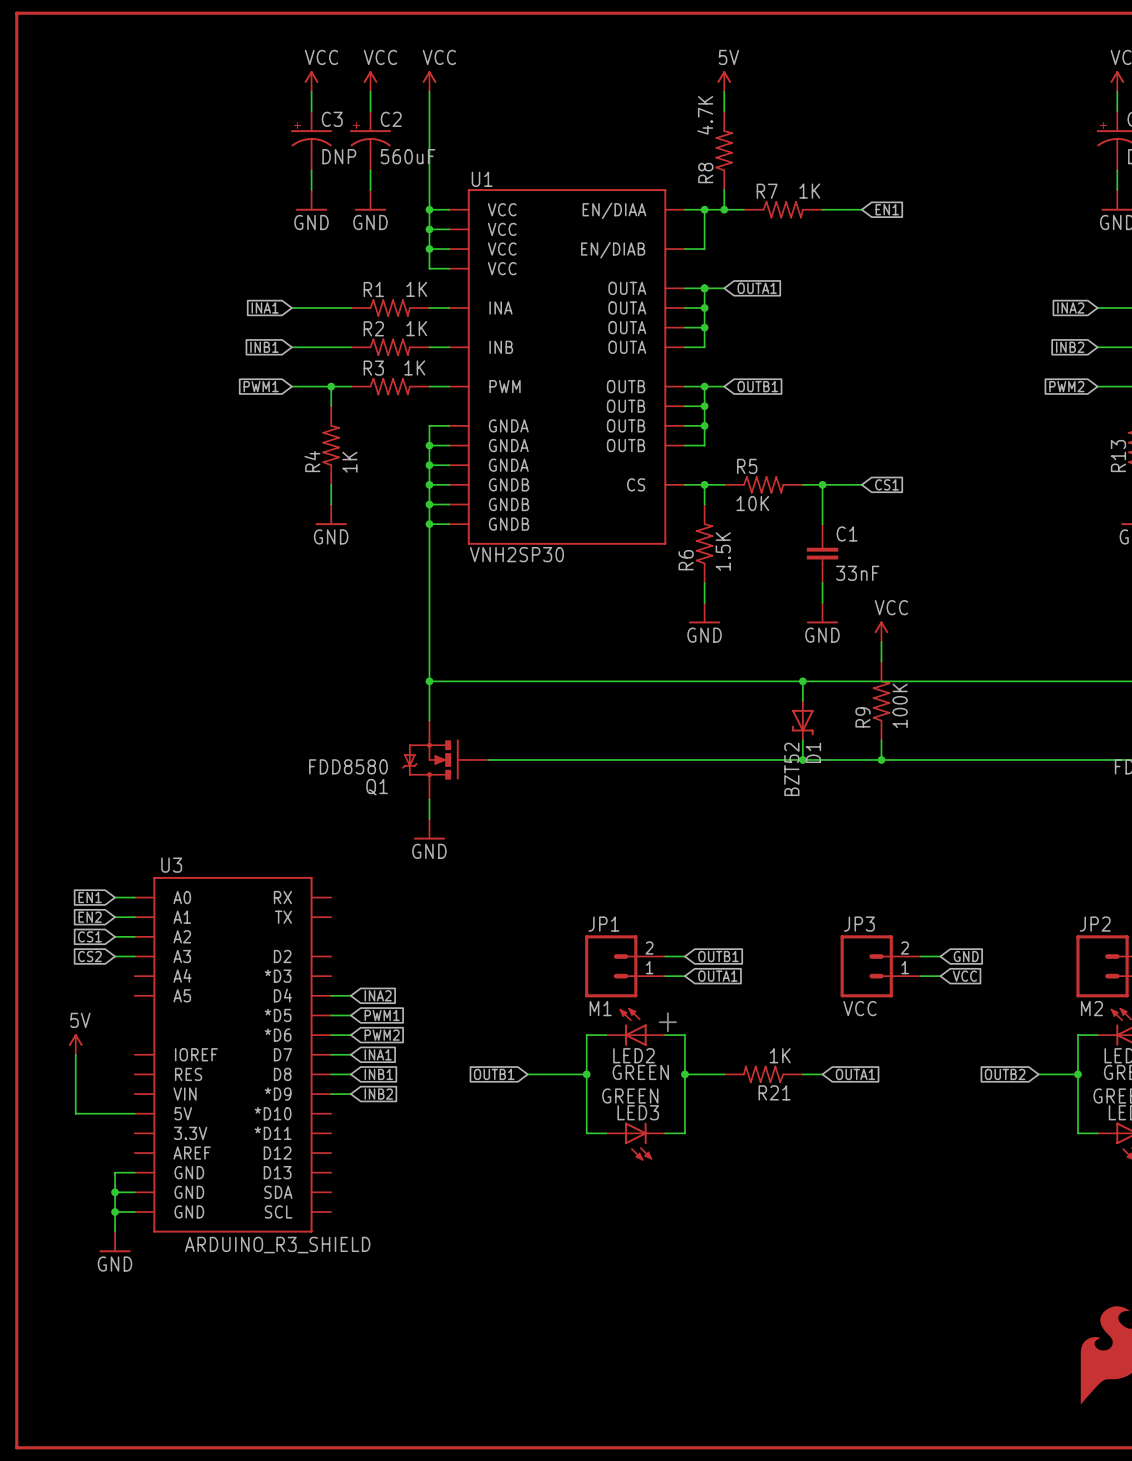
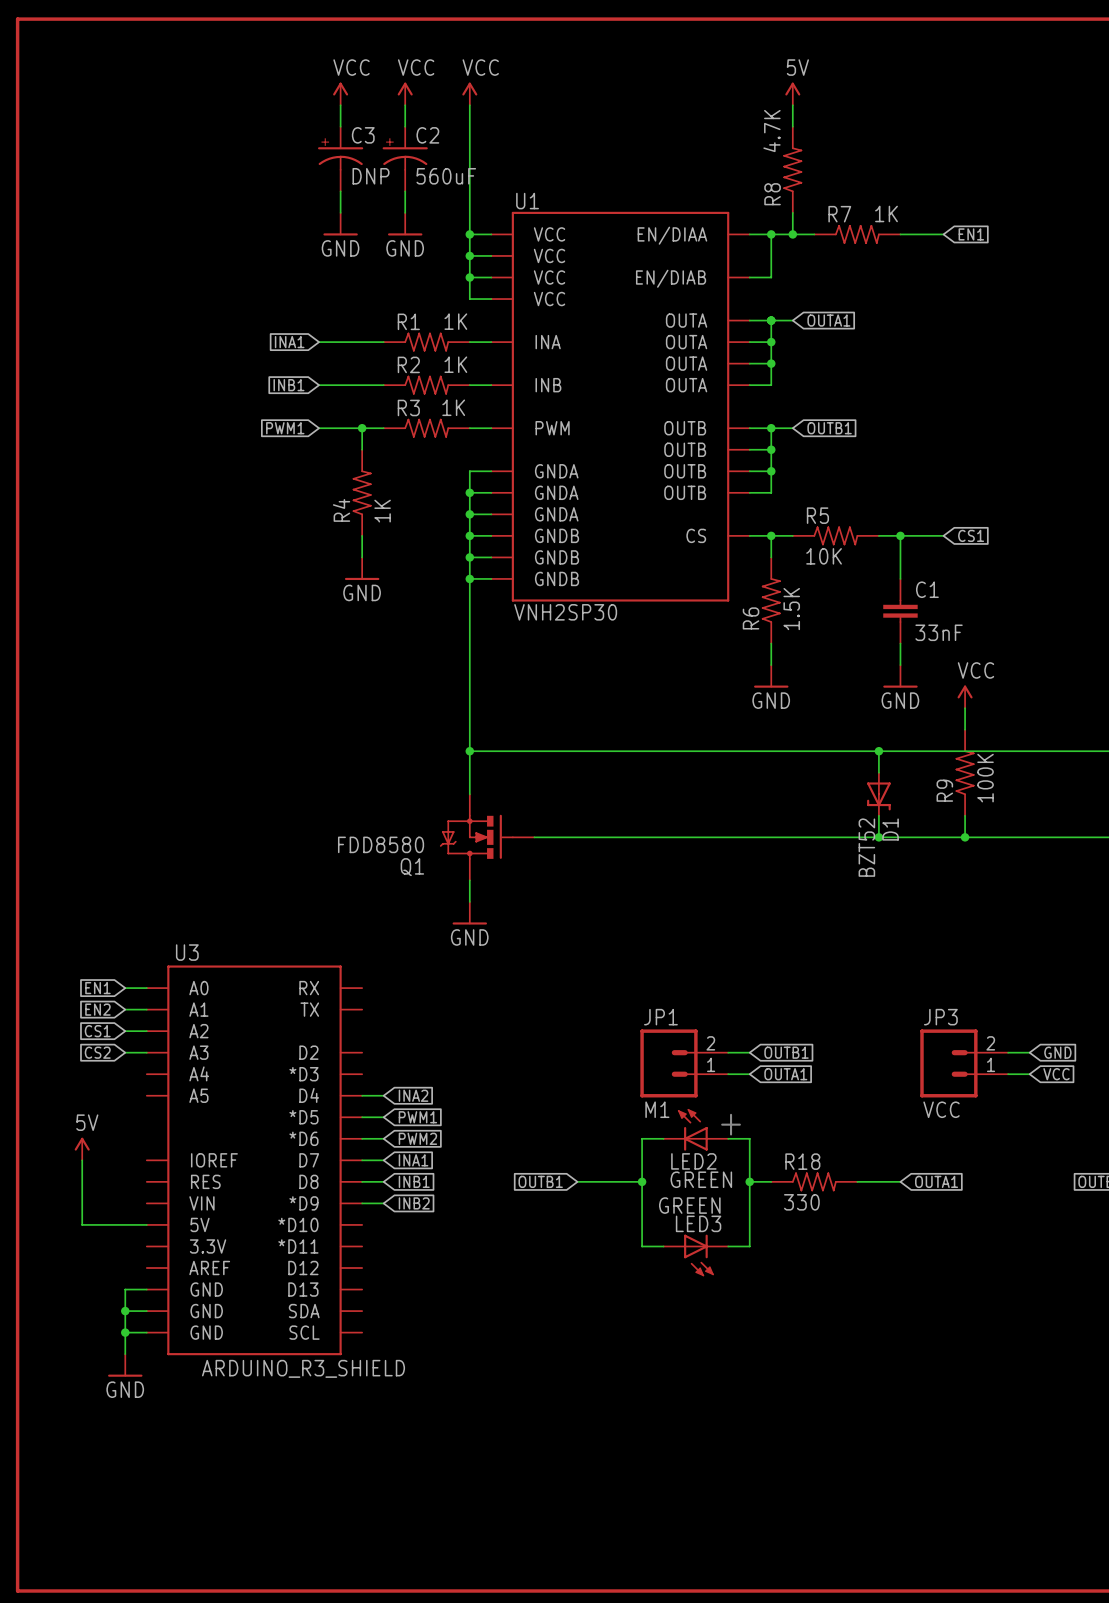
R18: none -> 330 (814, 1181)
R21: 1K (763, 1074) -> none

